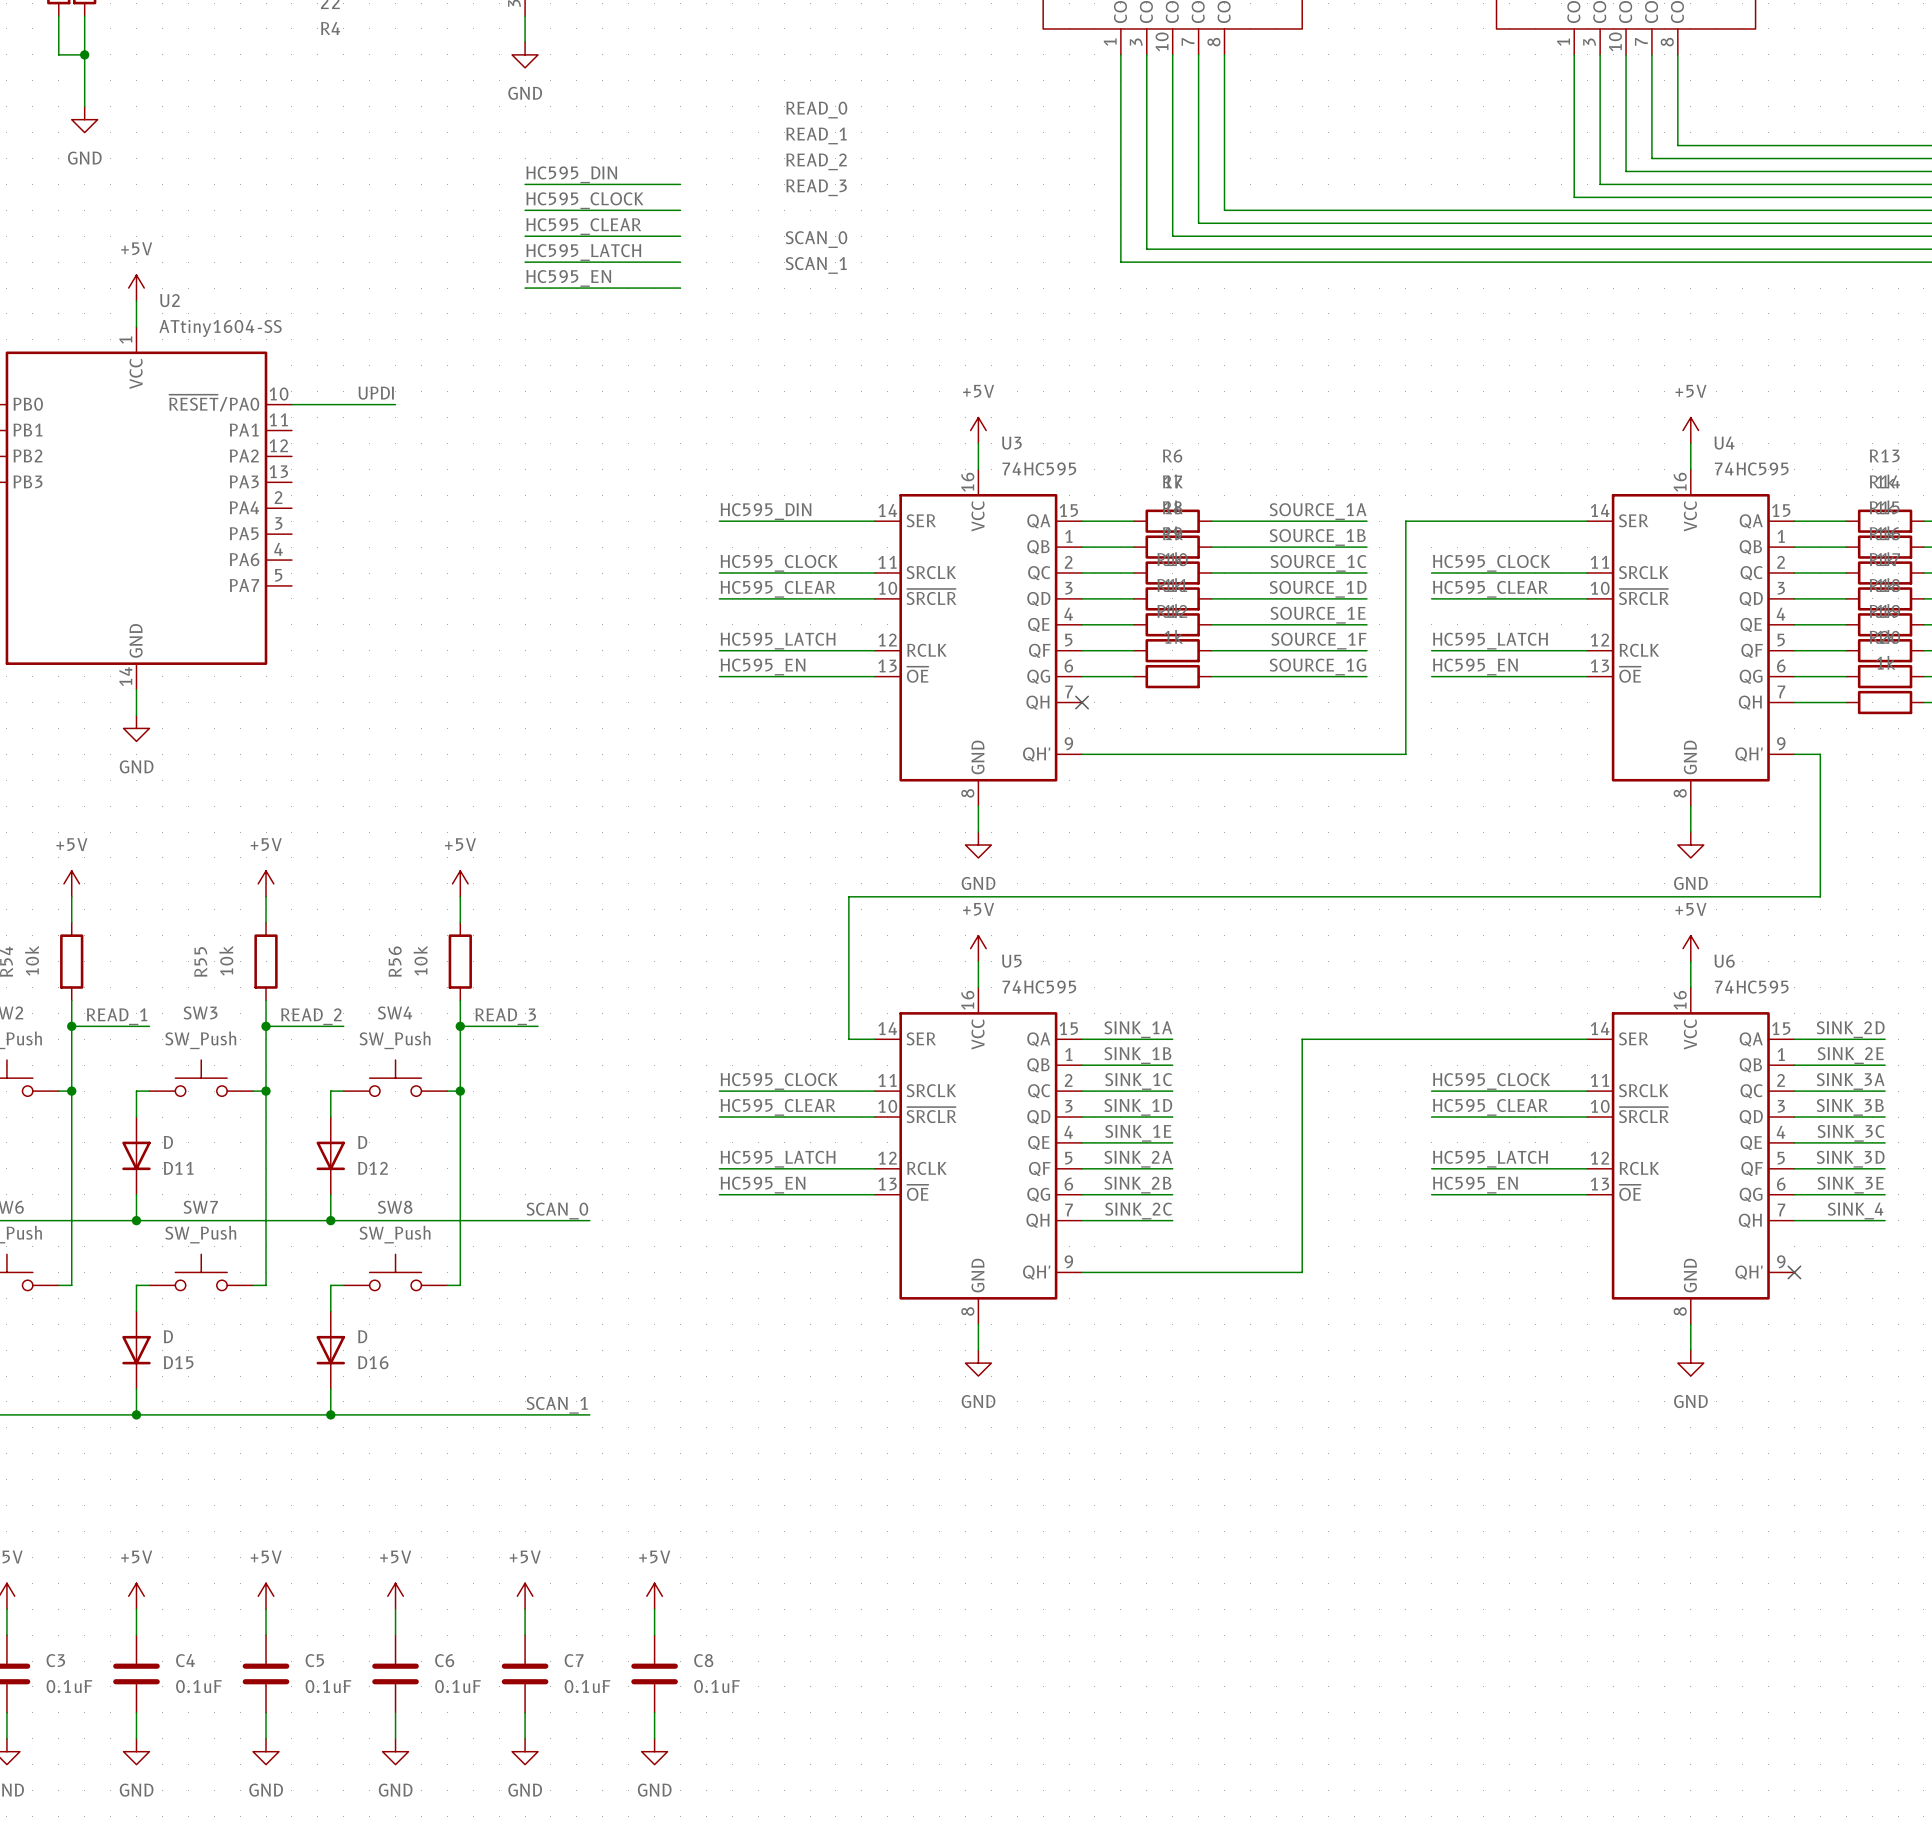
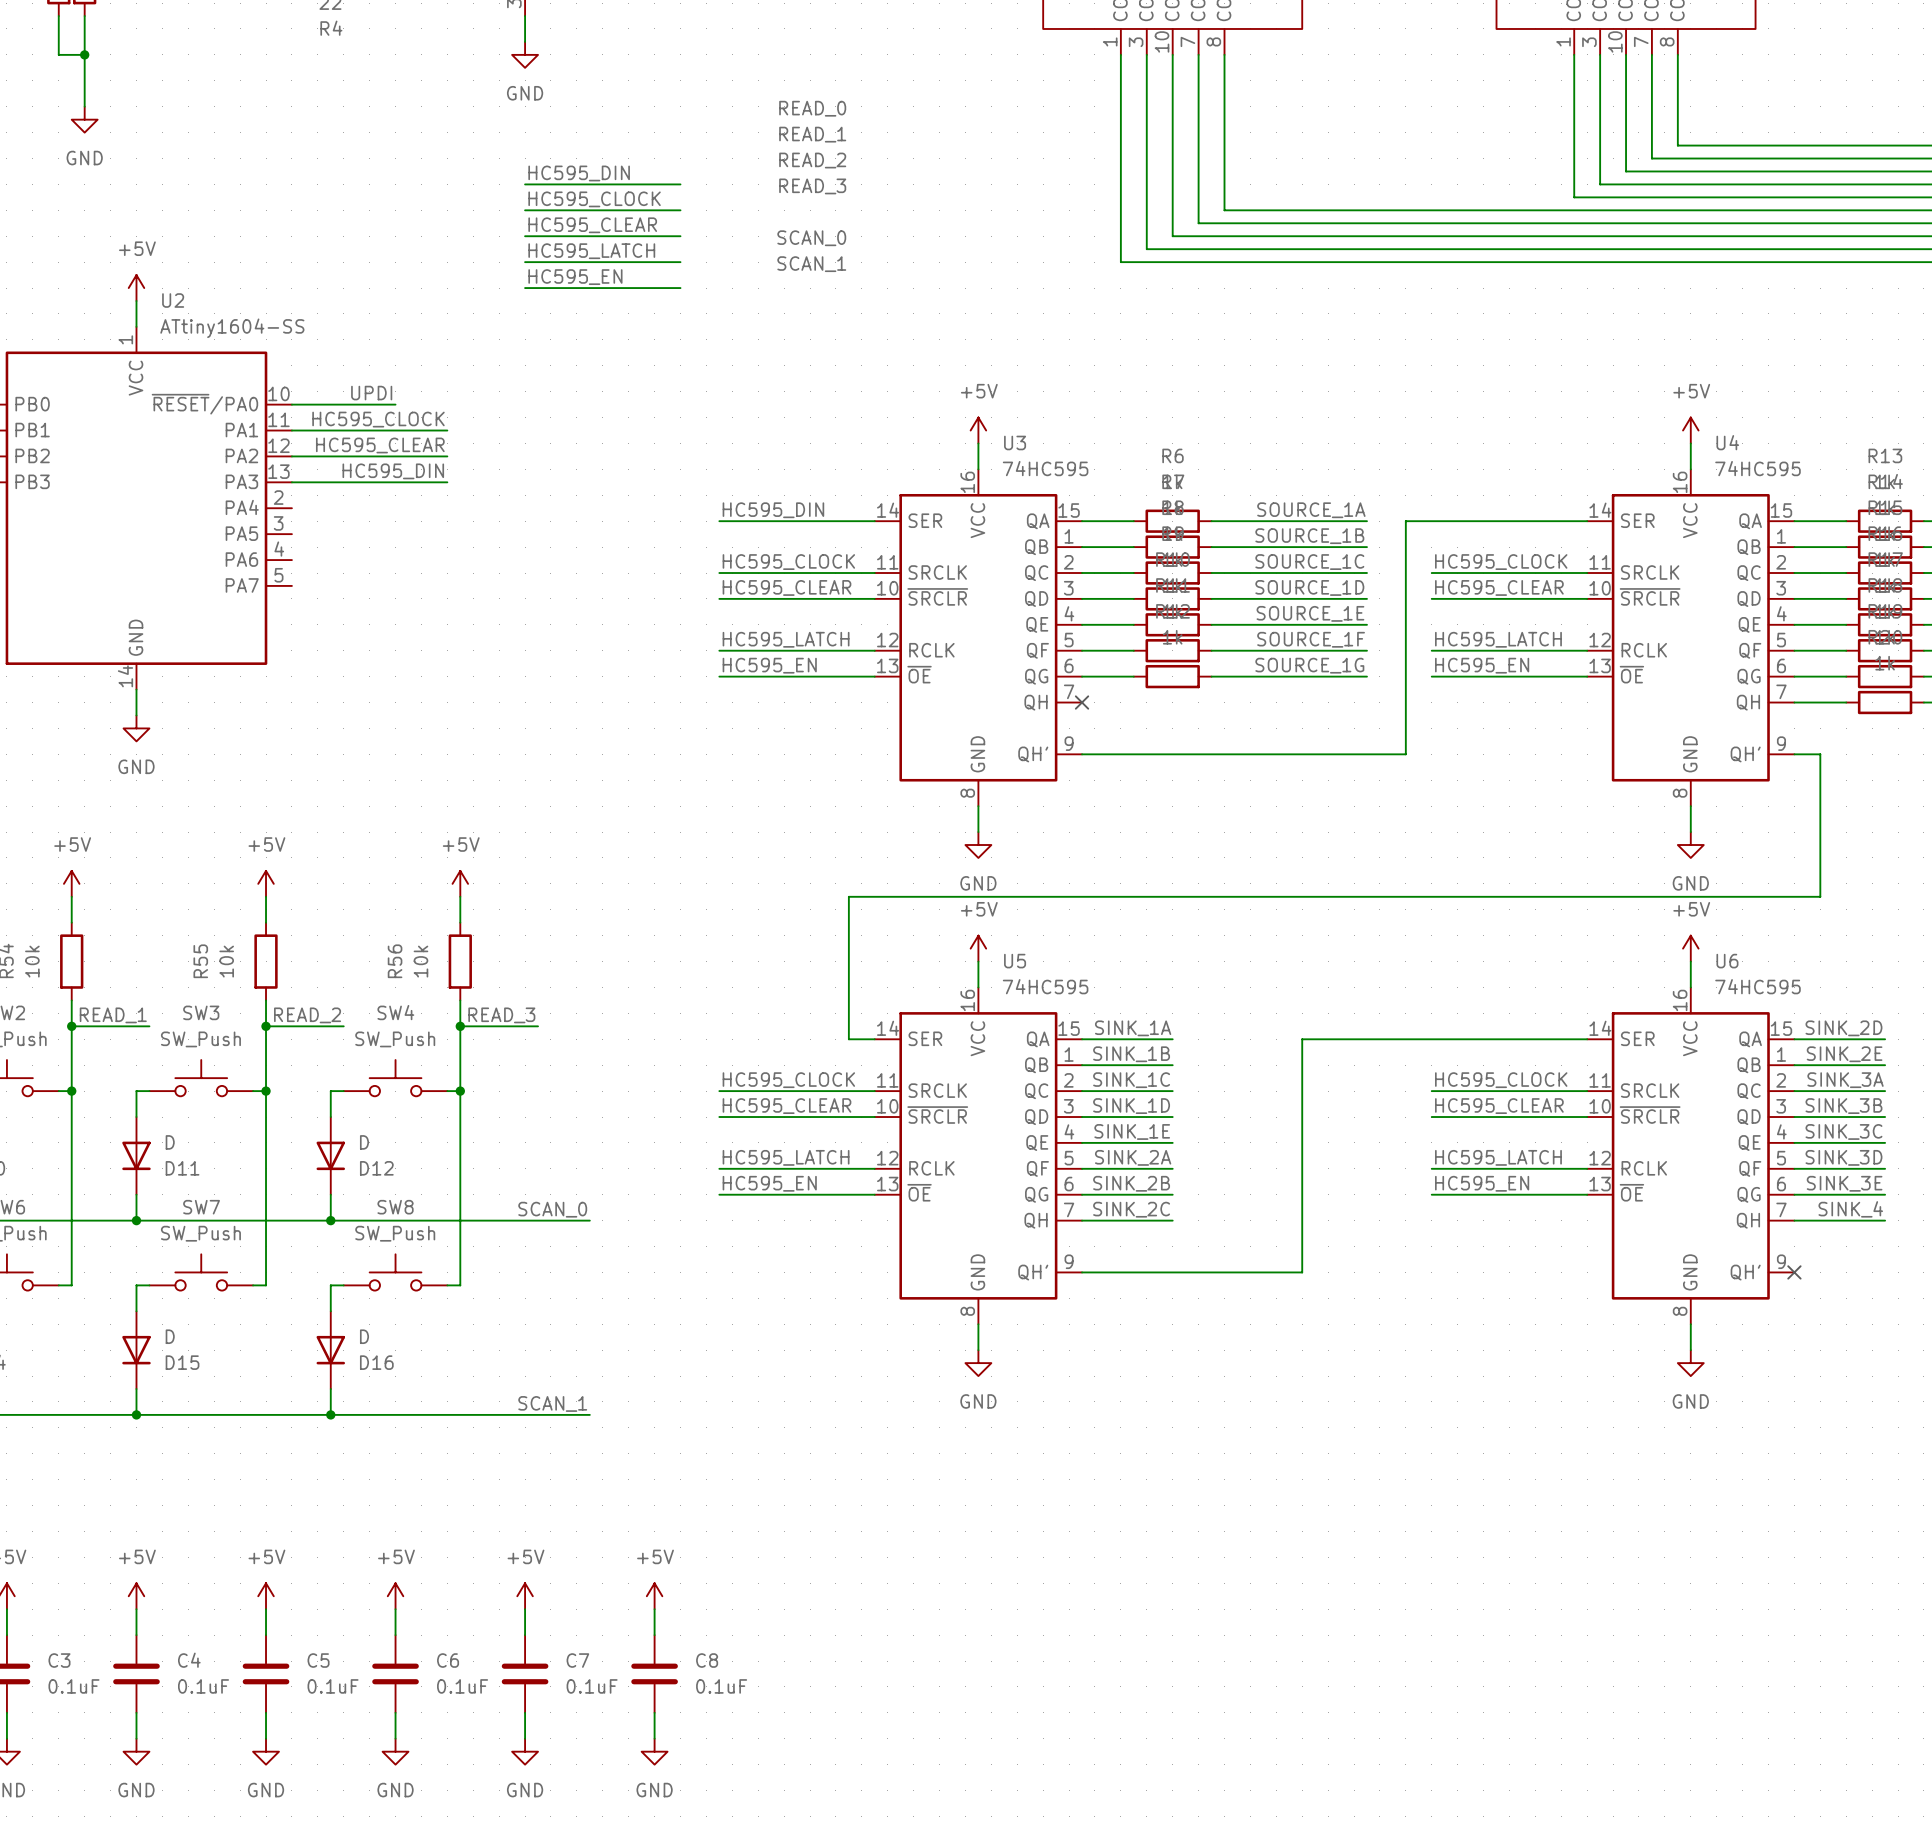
label: none -> HC595_CLOCK (378, 419)
wire: none -> (291, 430) (447, 430)
label: none -> HC595_CLEAR (380, 445)
wire: none -> (291, 456) (447, 456)
label: none -> HC595_DIN (393, 471)
wire: none -> (291, 482) (447, 482)

